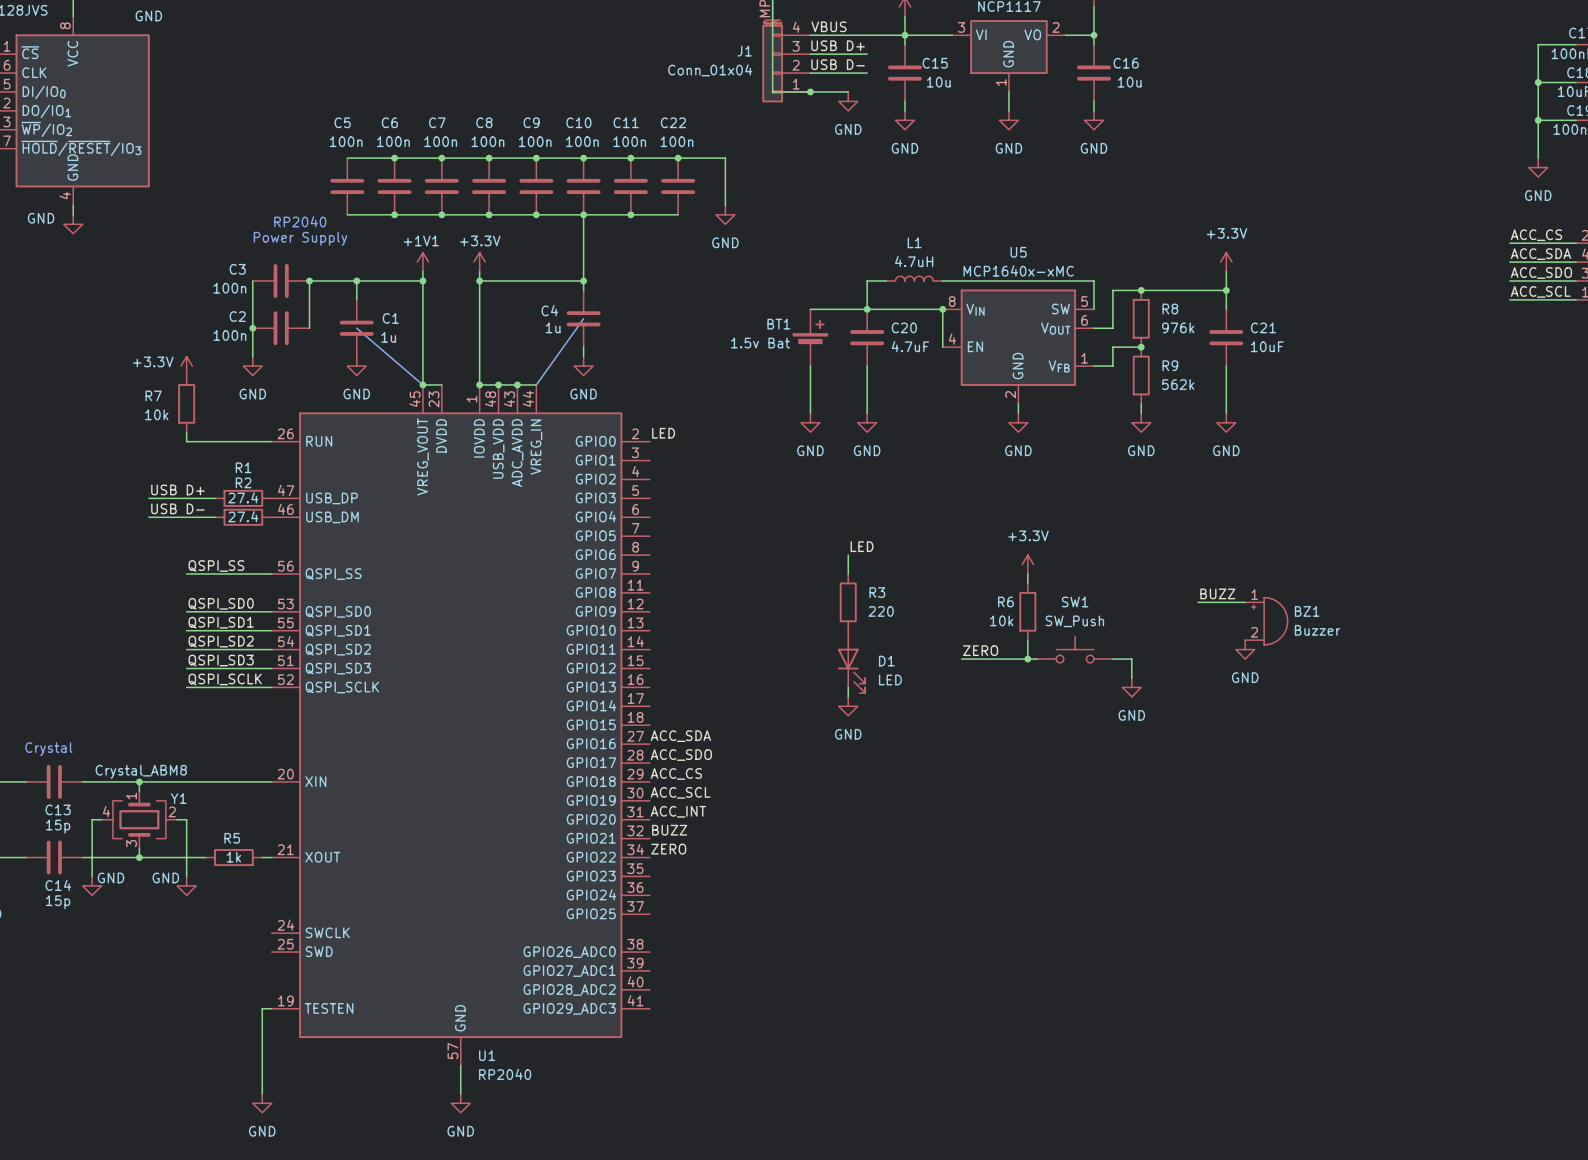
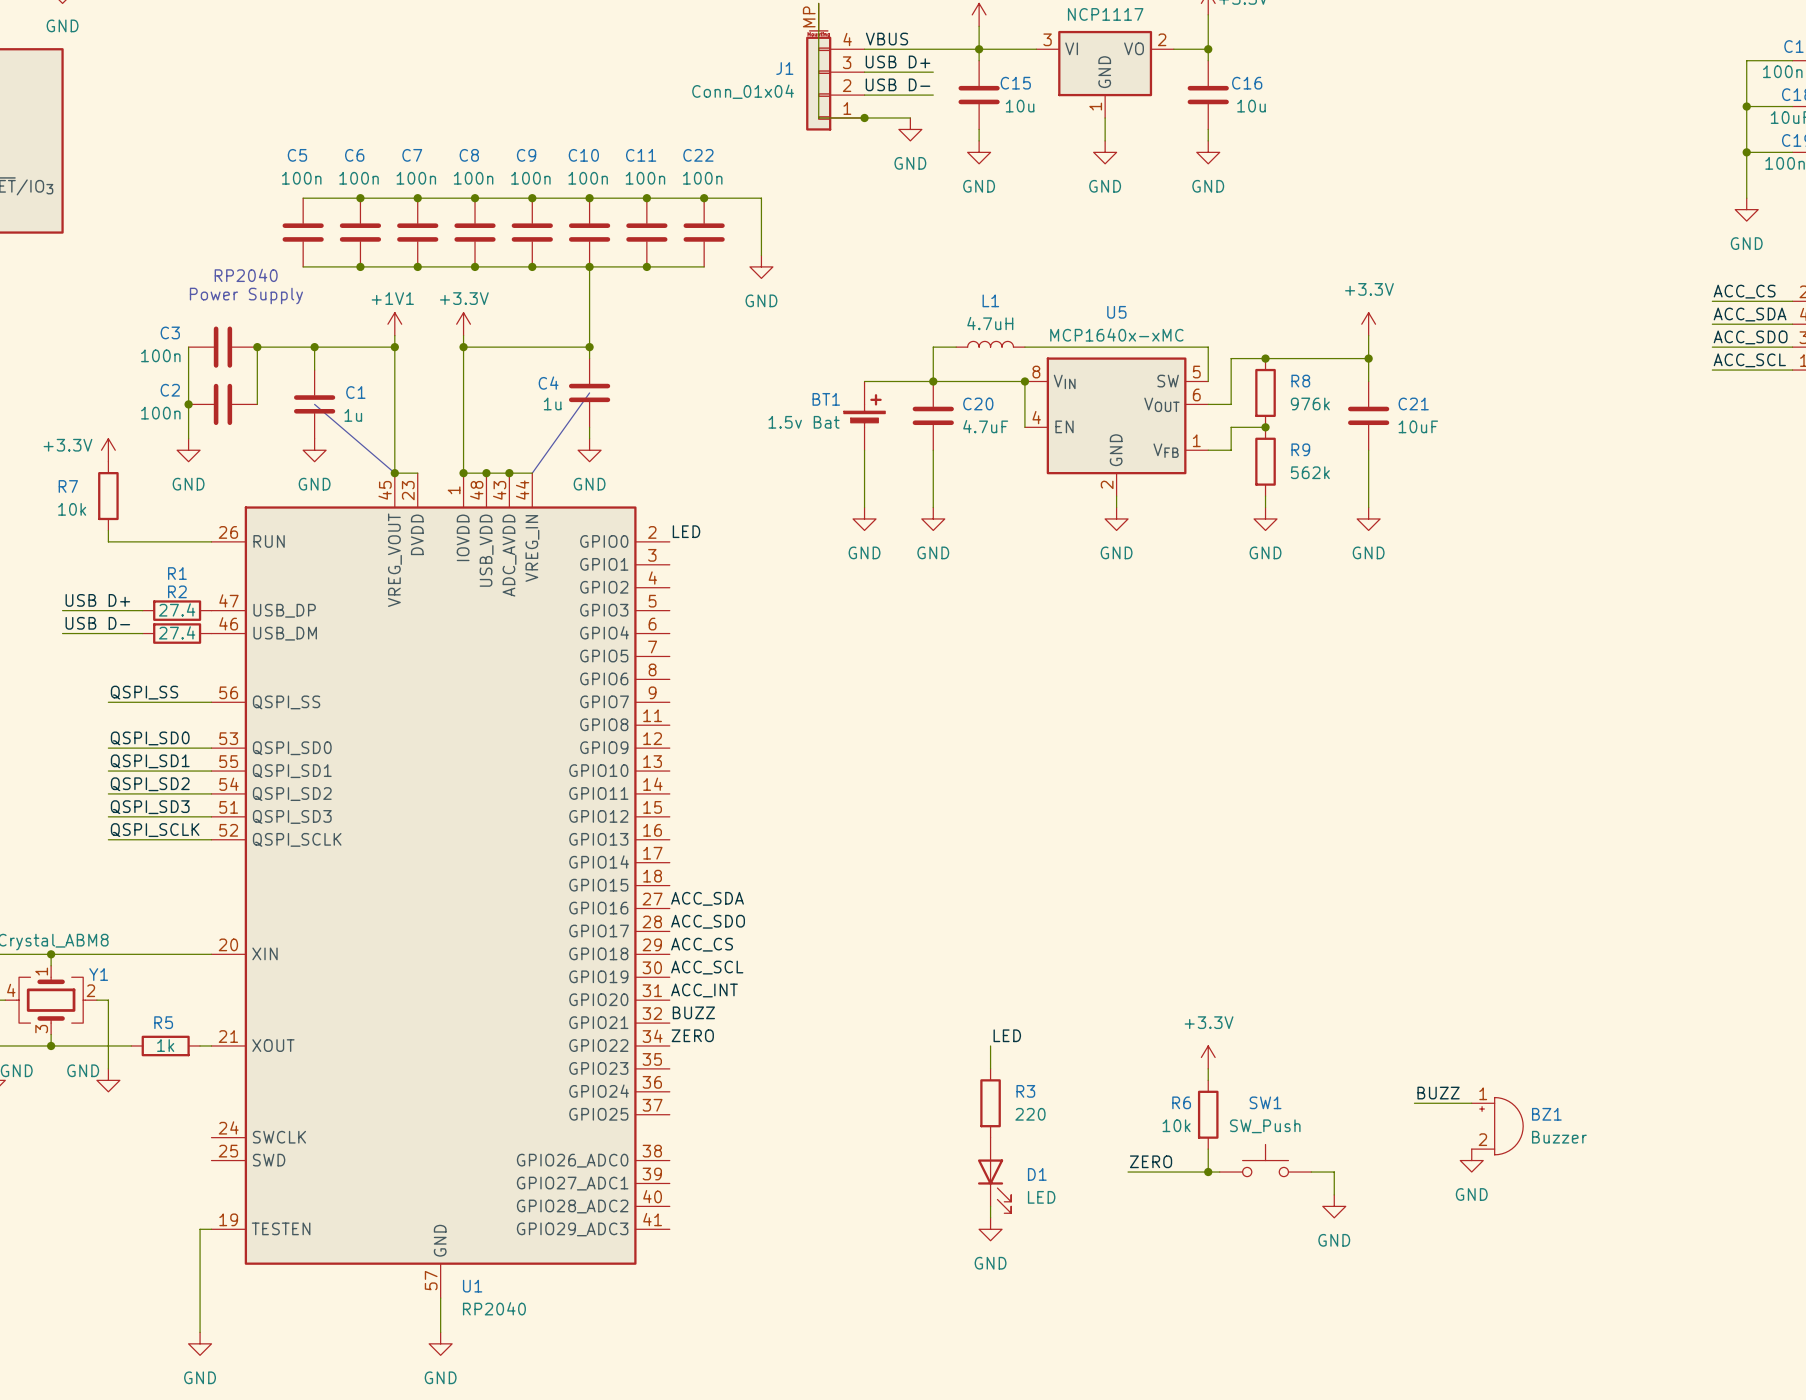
label: LED (862, 546) -> none
wire: (848, 555) (848, 573) -> none
power symbol: +3.3V (1027, 564) -> none
wire: (1027, 573) (1027, 583) -> none
label: BUZZ (1217, 593) -> none
R3 position: (848, 602) -> (990, 1103)
wire: (1197, 602) (1245, 602) -> none
R6 position: (1027, 611) -> (1208, 1114)
BZ1 position: (1266, 621) -> (1497, 1126)
wire: (1027, 640) (1027, 659) -> none
SW1 position: (1075, 649) -> (1265, 1160)
power symbol: GND (1245, 649) -> none
label: ZERO (980, 650) -> none
wire: (961, 659) (1037, 659) -> none
junction: (1027, 659) -> none
wire: (1112, 659) (1131, 659) (1131, 677) -> none
D1 position: (851, 661) -> (994, 1175)
wire: (848, 687) (848, 696) -> none
power symbol: GND (1131, 687) -> none
power symbol: GND (848, 706) -> none
label: none -> LED (1007, 1035)
wire: none -> (990, 1045) (990, 1068)
power symbol: none -> +3.3V (1208, 1057)
wire: none -> (1208, 1068) (1208, 1080)
label: none -> BUZZ (1438, 1093)
wire: none -> (1414, 1103) (1471, 1103)
wire: none -> (1208, 1149) (1208, 1172)
power symbol: none -> GND (1471, 1160)
label: none -> ZERO (1151, 1161)
wire: none -> (1128, 1172) (1219, 1172)
junction: none -> (1208, 1172)
wire: none -> (1311, 1172) (1334, 1172) (1334, 1194)
wire: none -> (990, 1206) (990, 1217)
power symbol: none -> GND (1334, 1206)
power symbol: none -> GND (990, 1229)

